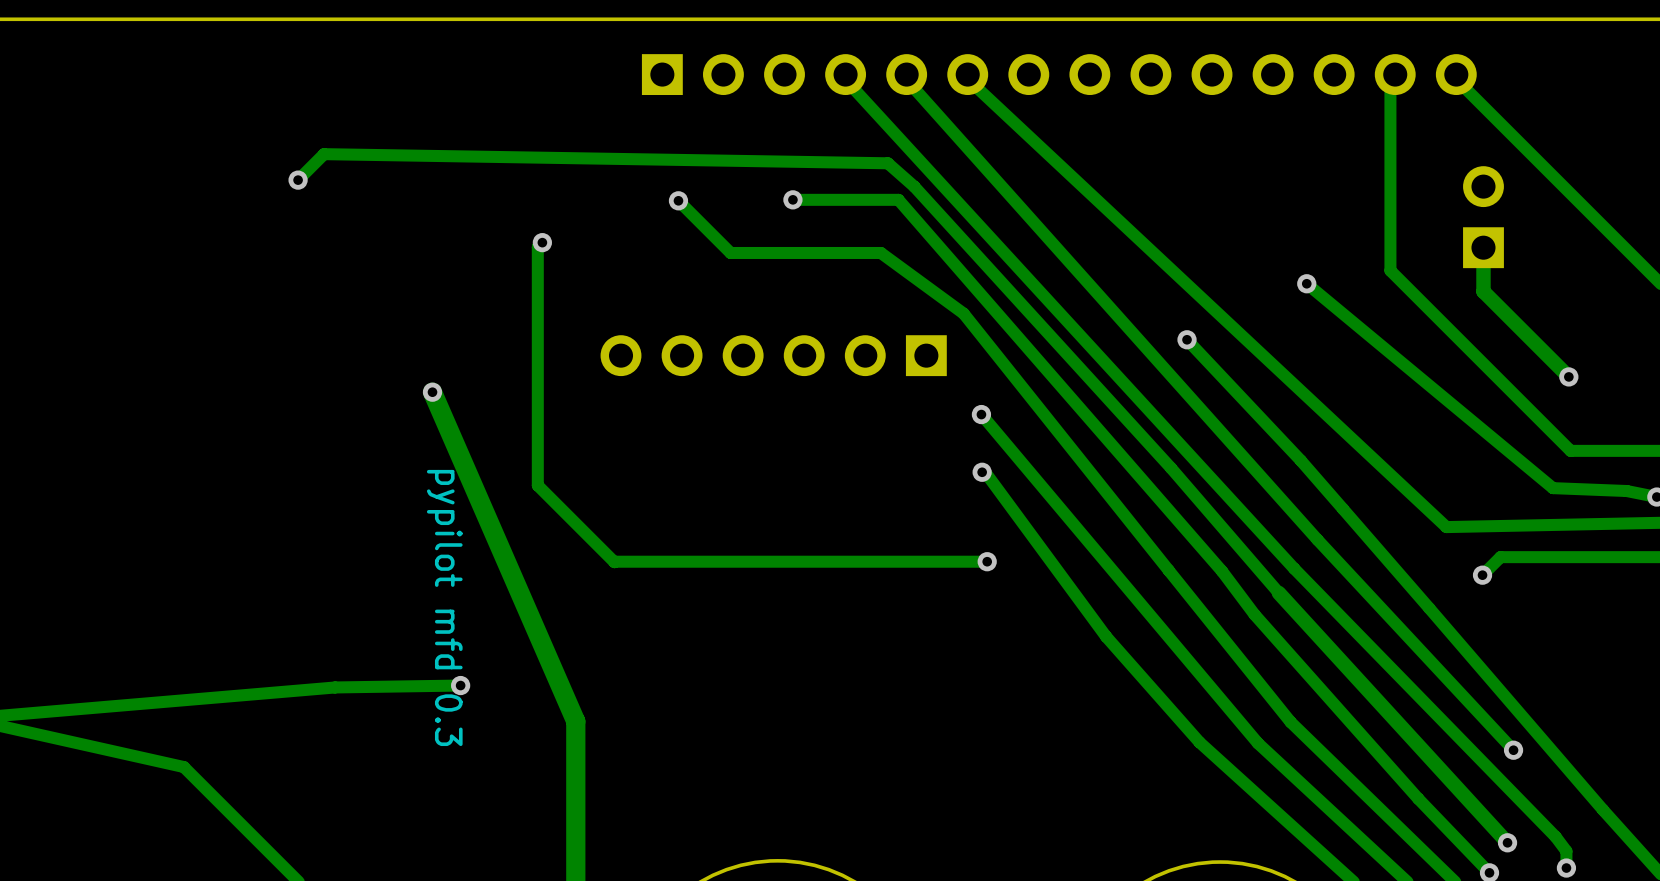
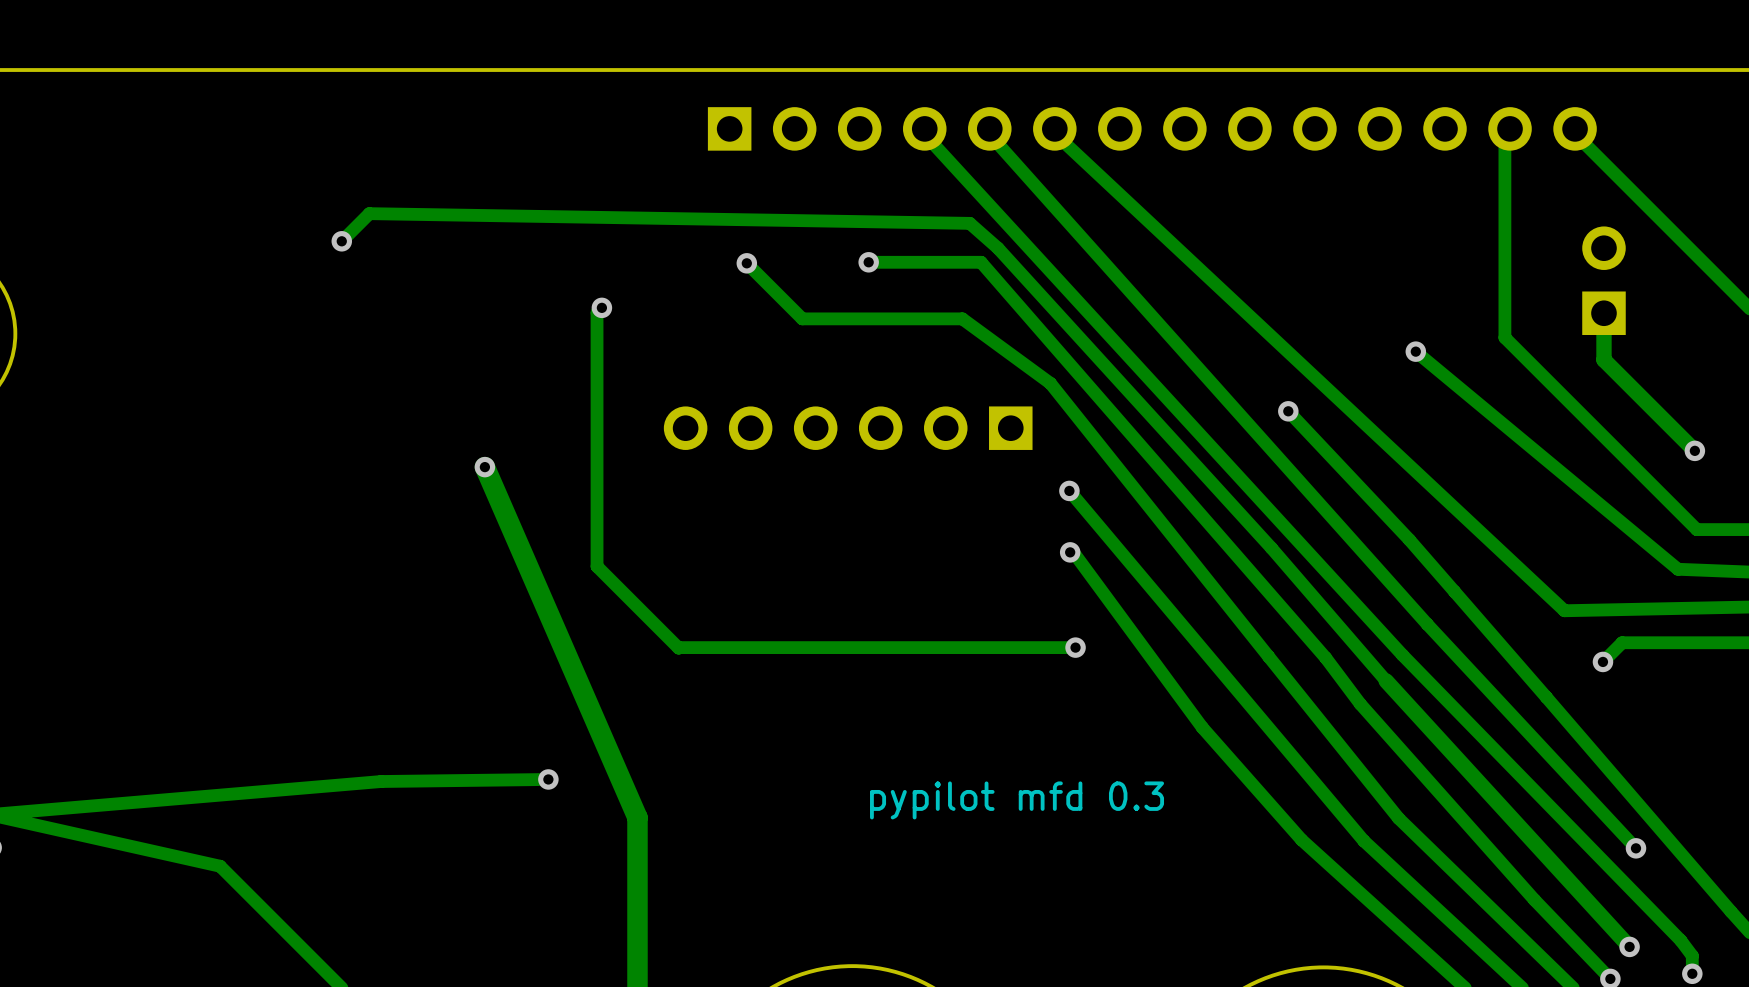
text rotation: 0° (444, 607) -> 90° counterclockwise (1017, 800)
text position: pypilot mfd 0.3 (444, 607) -> pypilot mfd 0.3 (1017, 800)
track: (460, 685) (335, 687) -> (548, 779) (381, 781)
via position: (460, 685) -> (548, 779)

